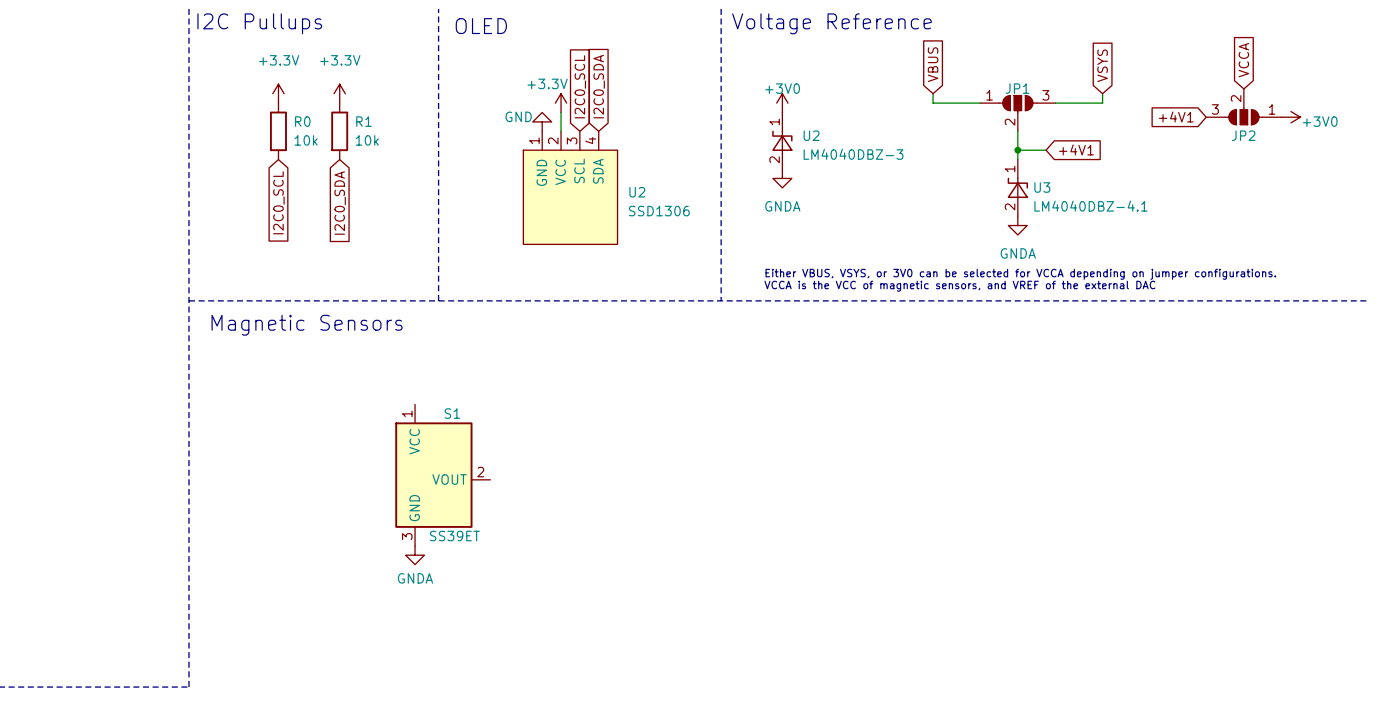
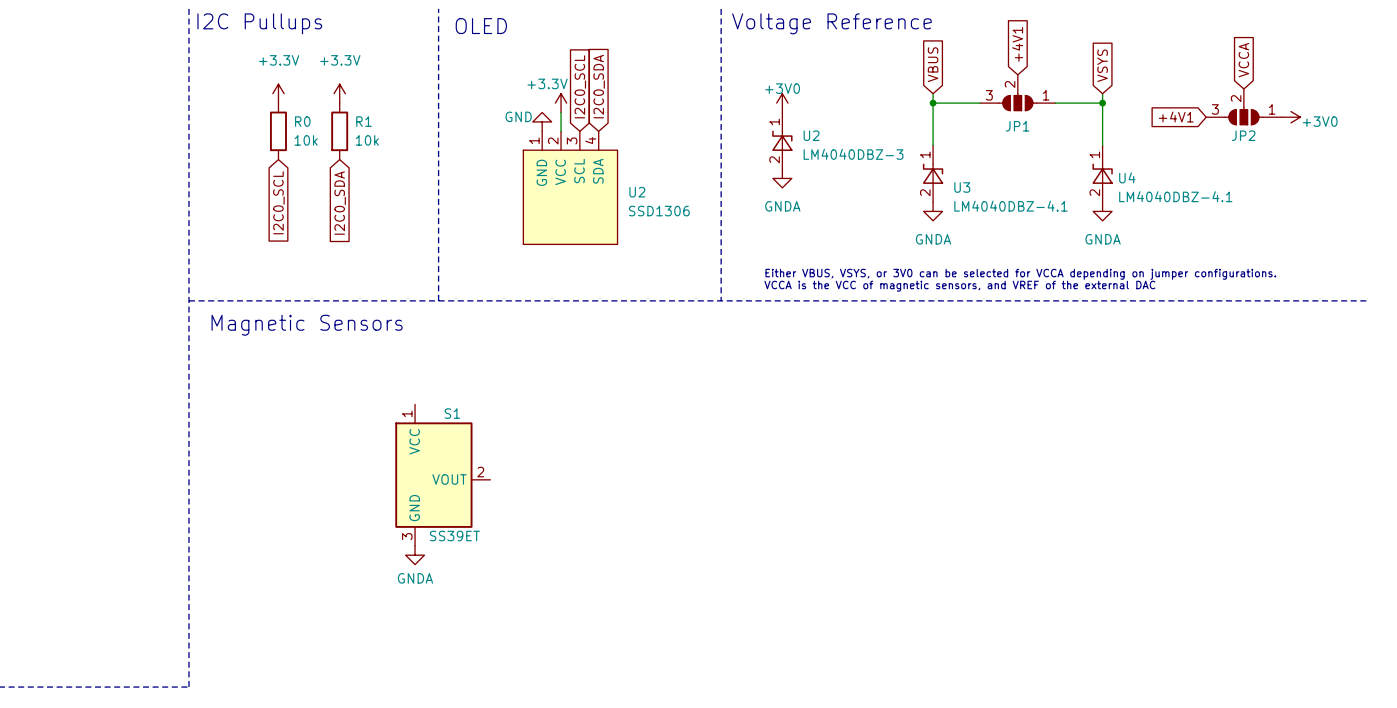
wire: none -> (933, 103) (933, 145)
junction: none -> (933, 103)
wire: none -> (1102, 103) (1102, 145)
junction: none -> (1102, 103)
JP1 rotation: 0° (1017, 104) -> 180° (1017, 102)
wire: (1017, 131) (1017, 159) -> none
global label rotation: 0° (1076, 149) -> 90° counterclockwise (1017, 44)
global label position: +4V1 (1076, 149) -> +4V1 (1017, 44)
wire: (1017, 150) (1046, 150) -> none
junction: (1017, 150) -> none
U4: none -> LM4040DBZ-4.1 (1102, 173)
U3 position: (1017, 187) -> (933, 173)
U3 name position: U3 (1042, 187) -> U3 (962, 187)
U3 value position: LM4040DBZ-4.1 (1091, 206) -> LM4040DBZ-4.1 (1010, 206)
power symbol: none -> GNDA (933, 211)
power symbol: none -> GNDA (1102, 211)
power symbol: GNDA (1017, 225) -> none

